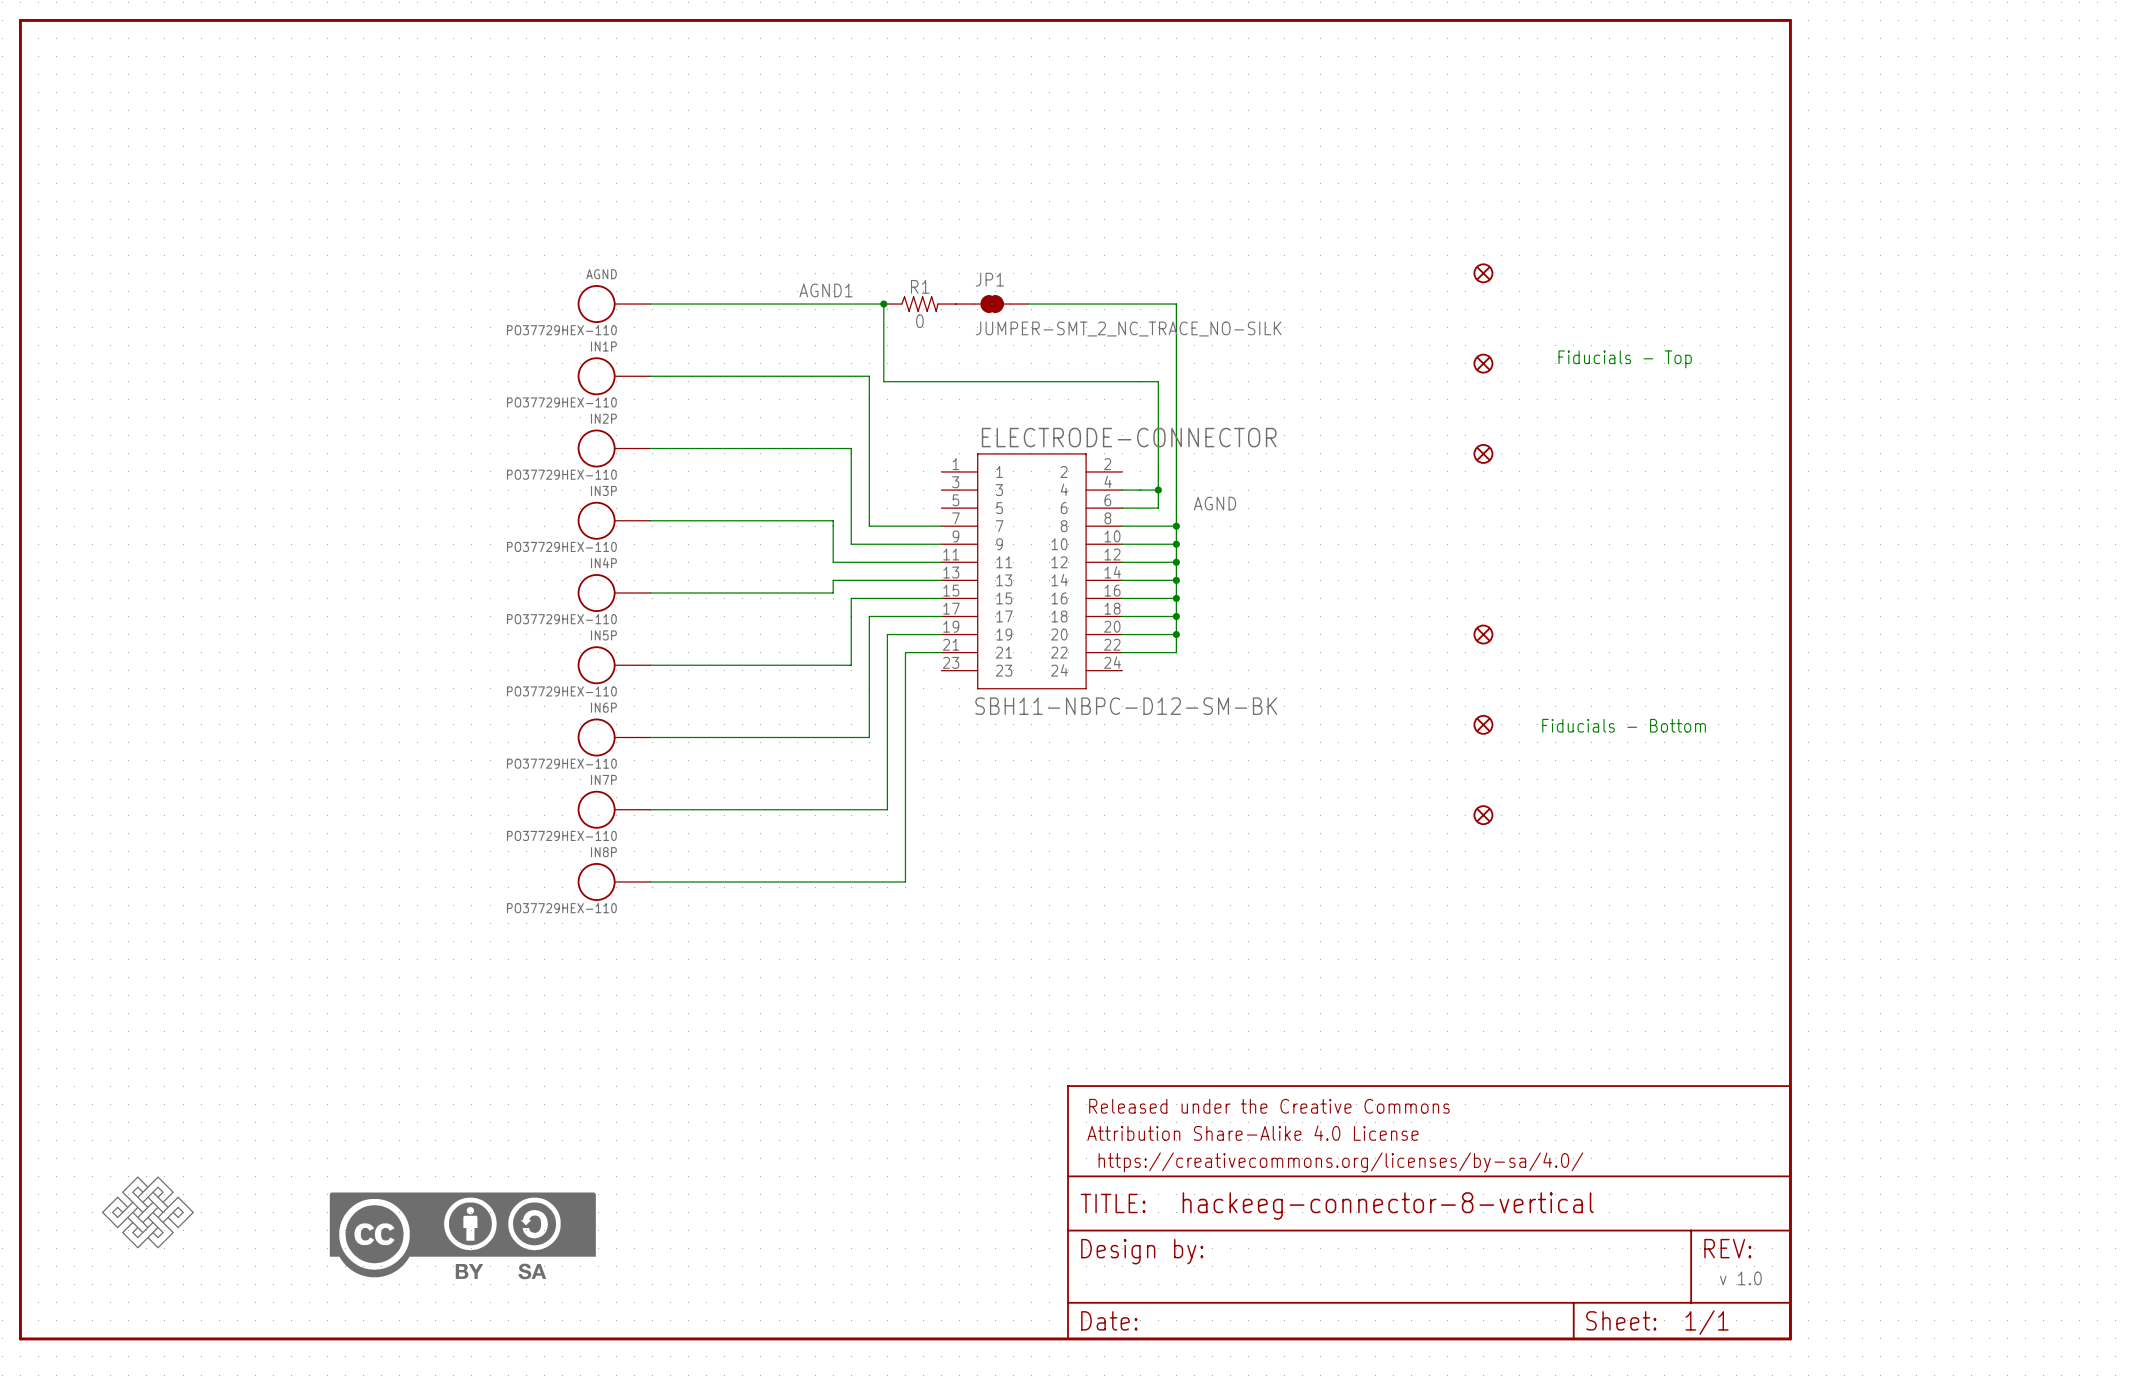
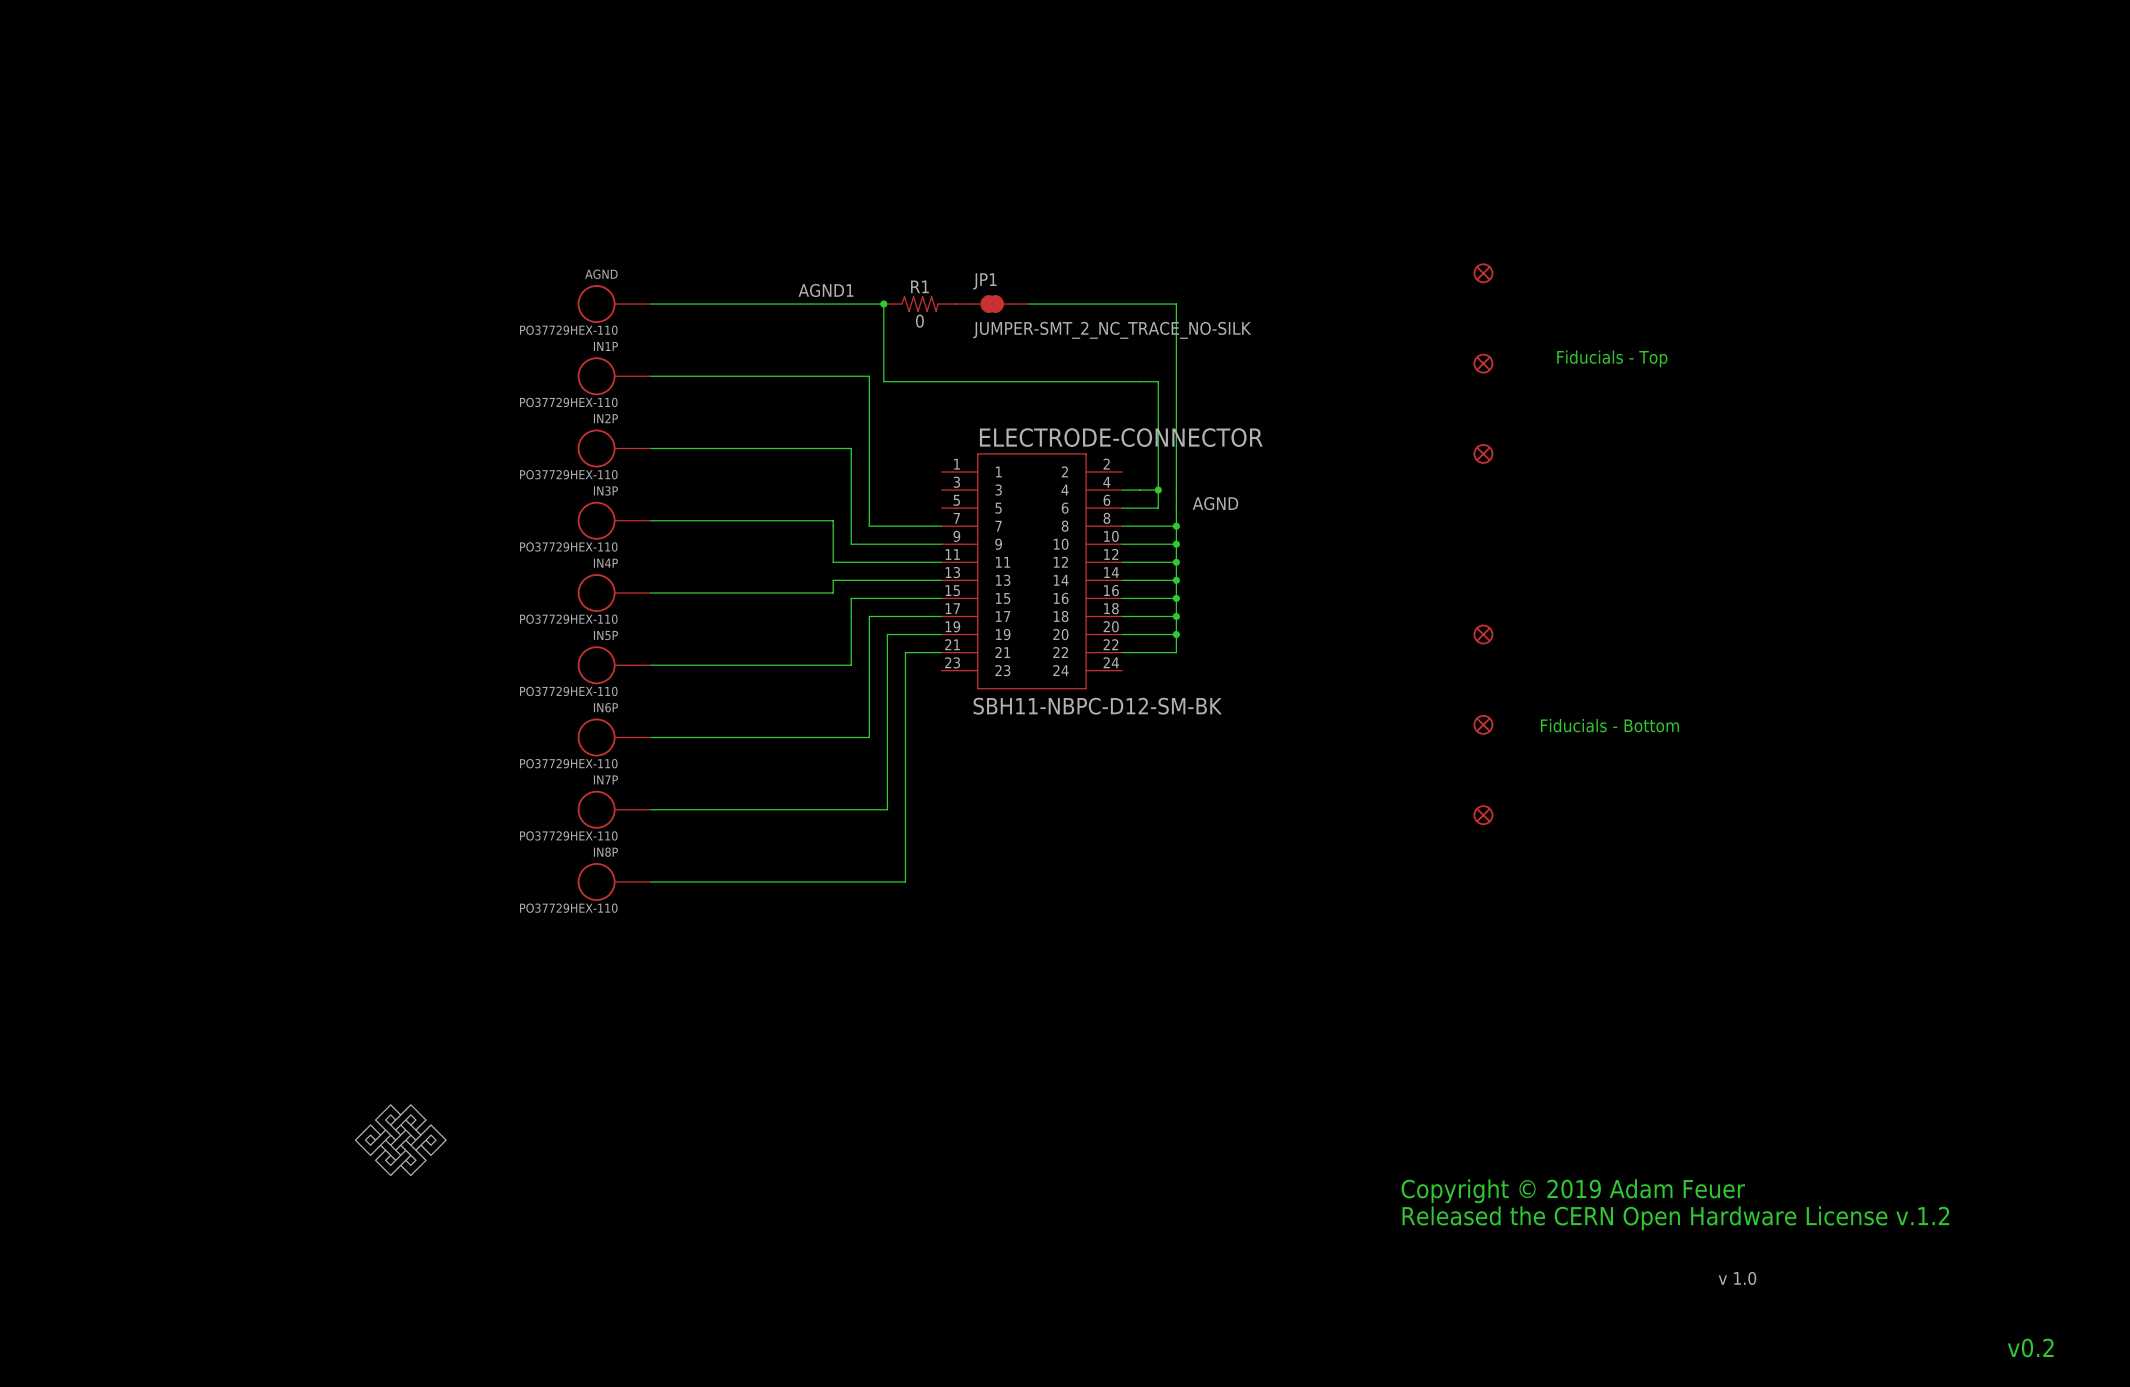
part: (905, 679) -> none
part: none -> (400, 1140)
text: none -> Copyright © 2019 Adam Feuer (1573, 1191)
part: (147, 1212) -> none
part: (1429, 1212) -> none
text: none -> Released the CERN Open Hardware License v.1.2 (1675, 1218)
part: (462, 1235) -> none
text: none -> v0.2 (2030, 1347)

